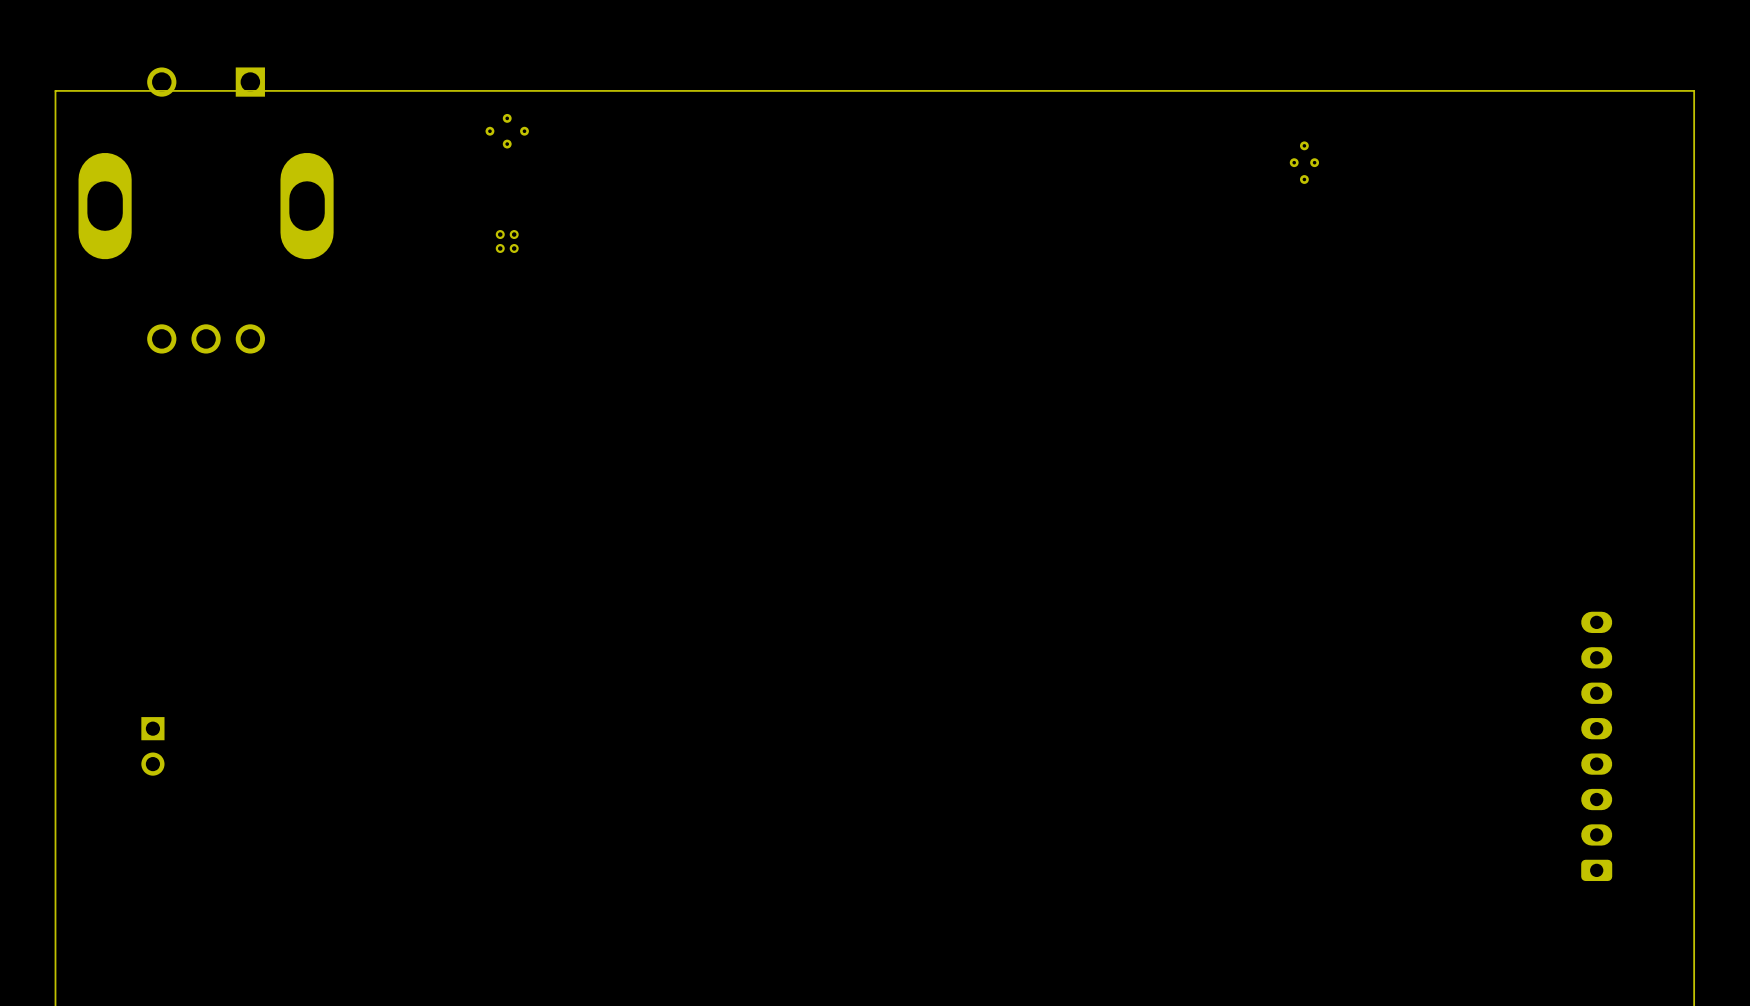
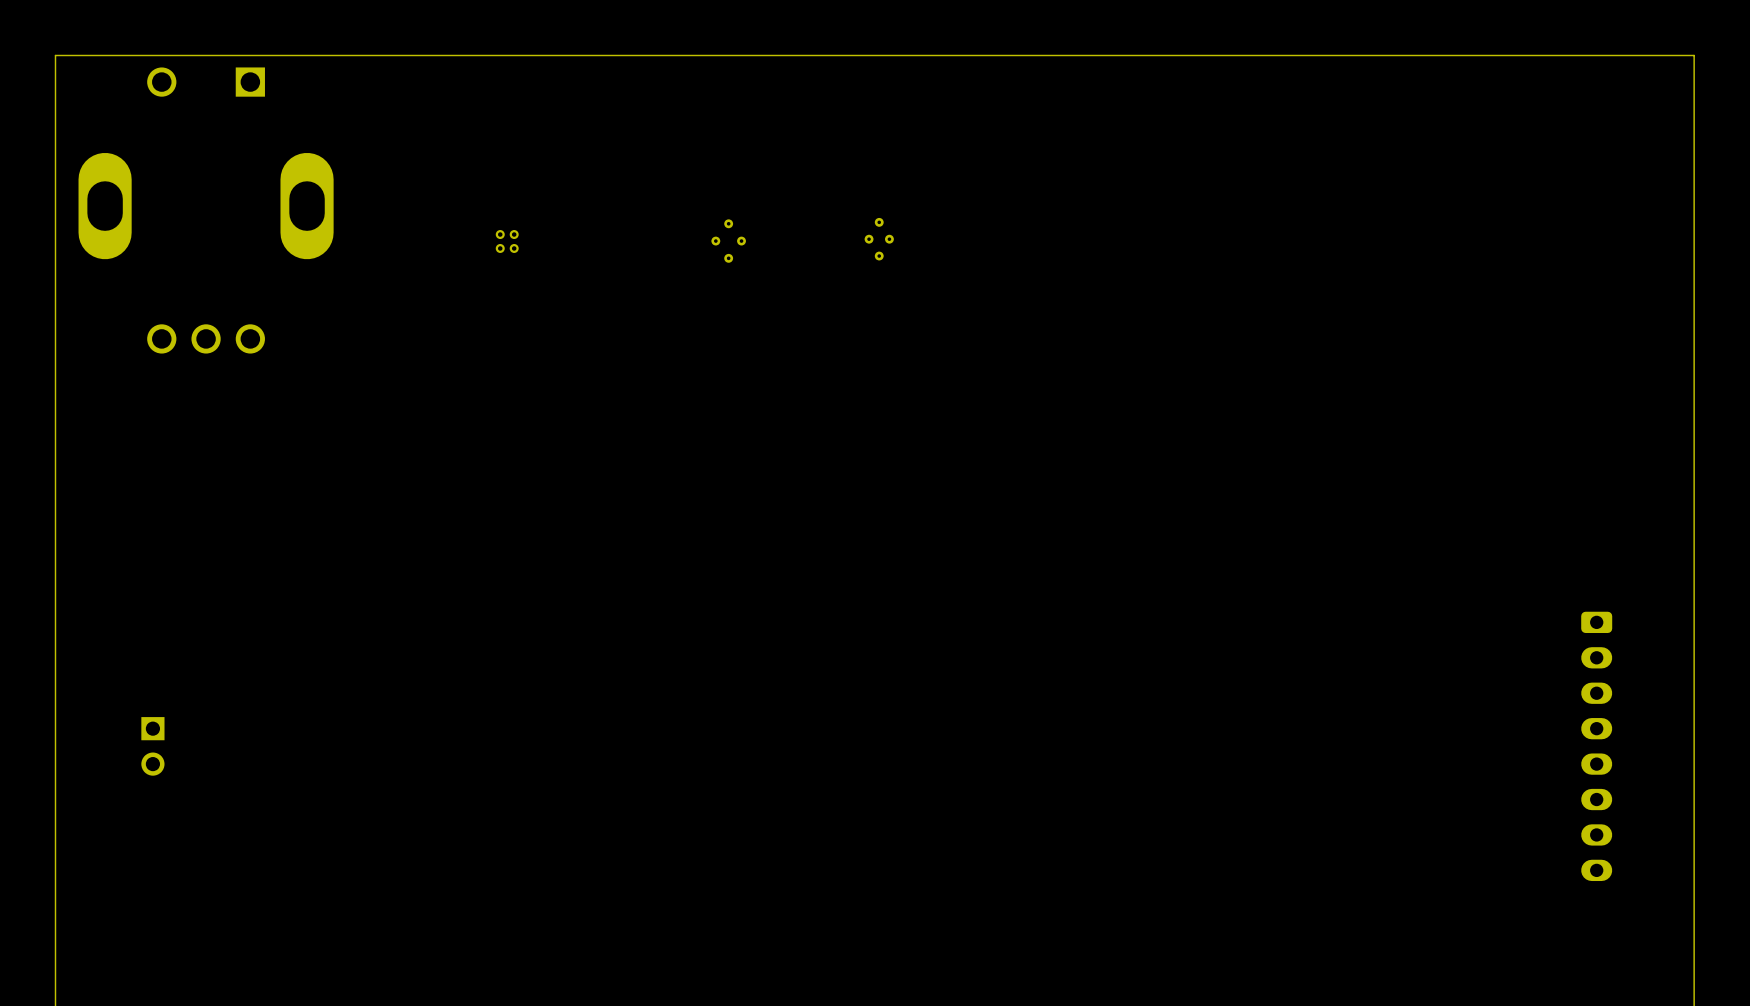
board edge: (1694, 90) (55, 90) -> (1694, 90) (1694, 55) (55, 55) (55, 90)
part rotation: 0° (507, 131) -> 90° clockwise (728, 241)
part position: (507, 131) -> (728, 241)
part position: (1304, 162) -> (879, 239)
part rotation: 0° (1596, 746) -> 180° (1596, 746)

